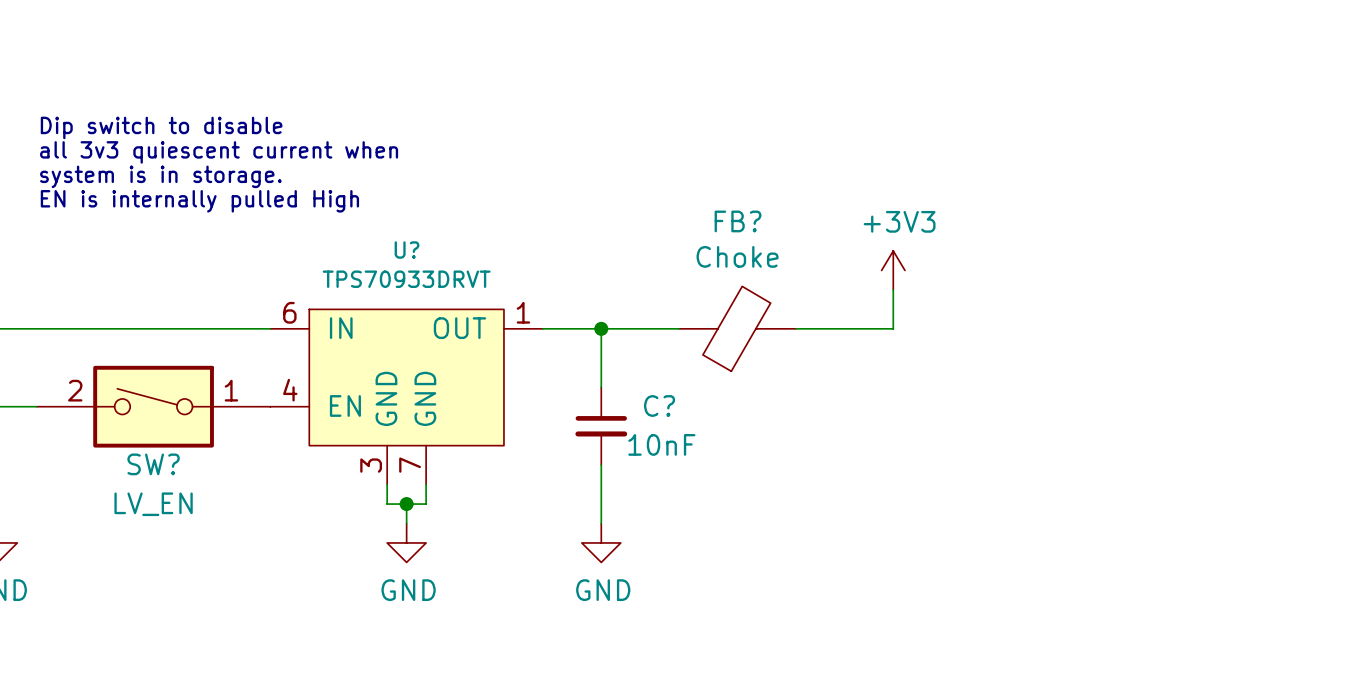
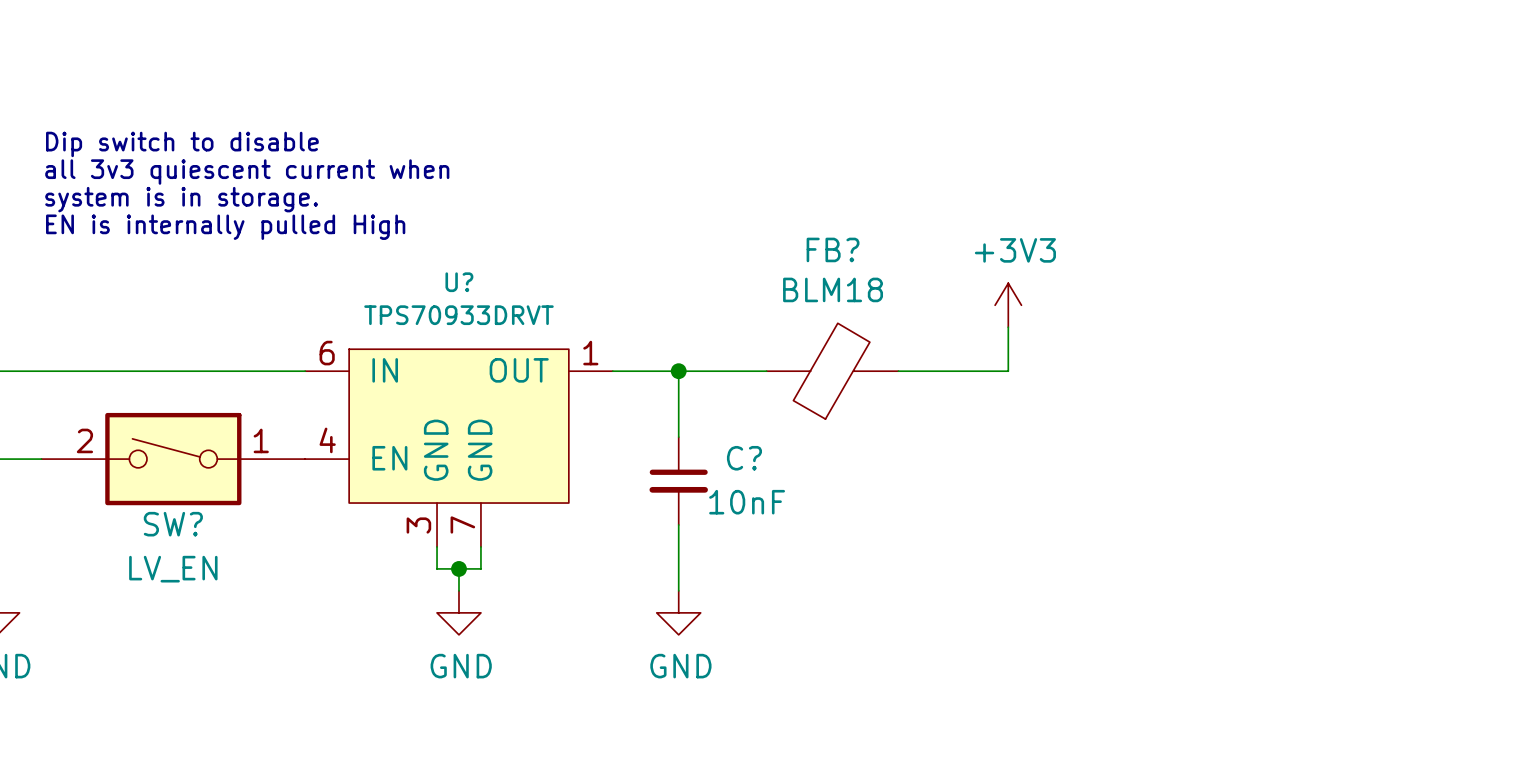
FB? value: Choke (737, 256) -> BLM18 (833, 289)

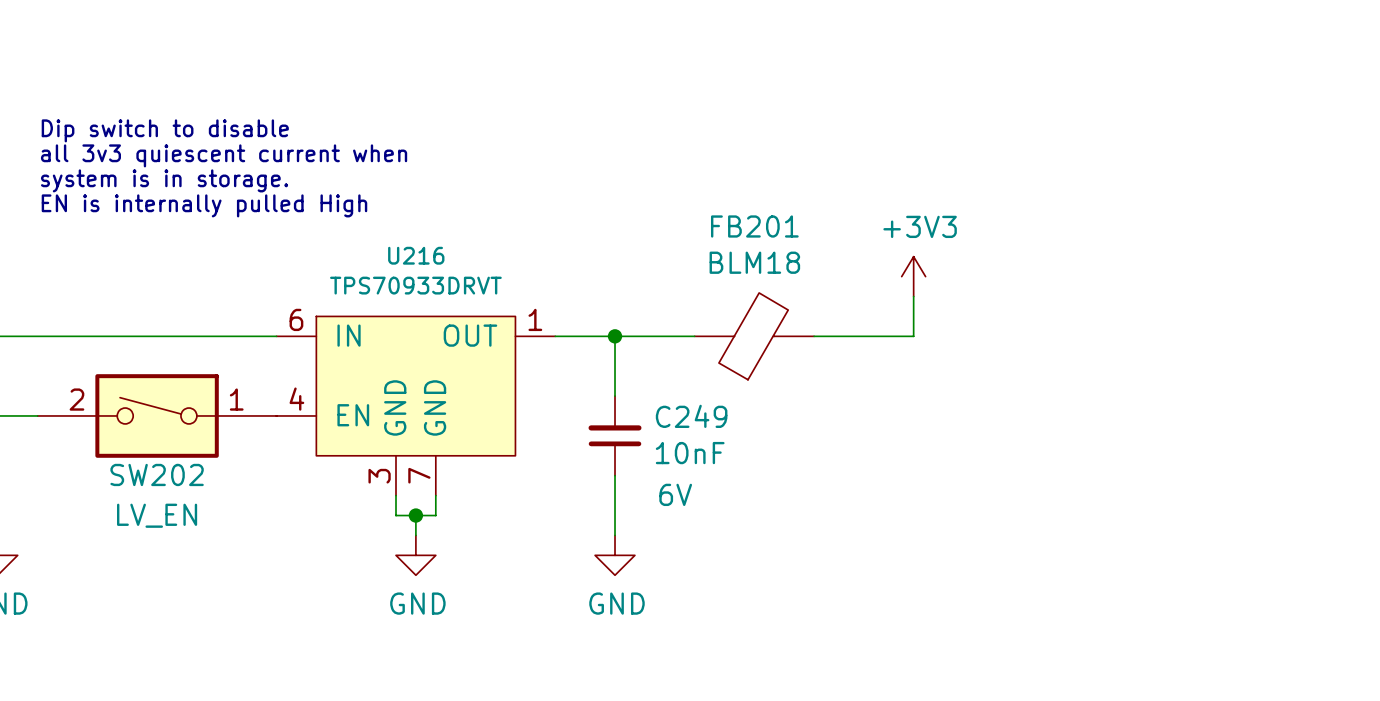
FB? name: FB? (833, 249) -> FB201 (754, 226)
U? name: U? (459, 282) -> U216 (416, 255)
C?: 10nF (678, 481) -> none
C249: none -> 10nF (615, 435)
SW? name: SW? (173, 524) -> SW202 (157, 474)

